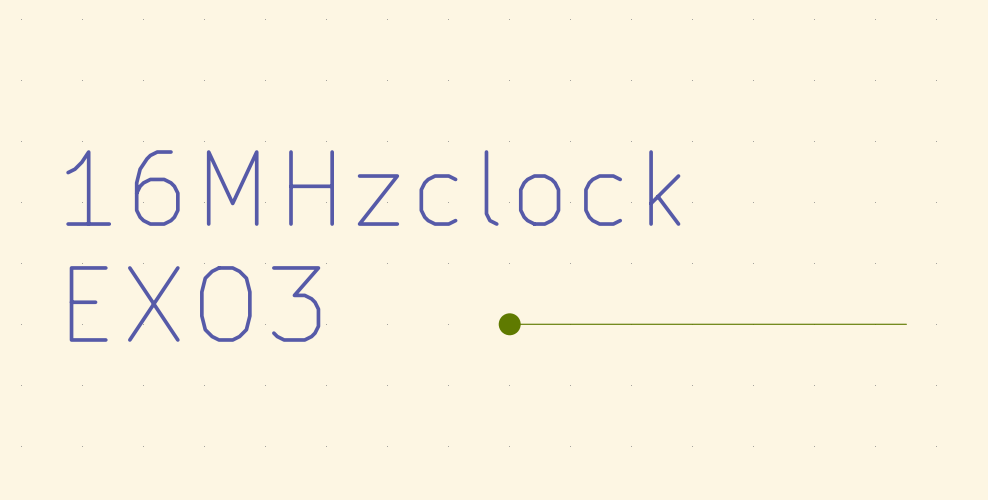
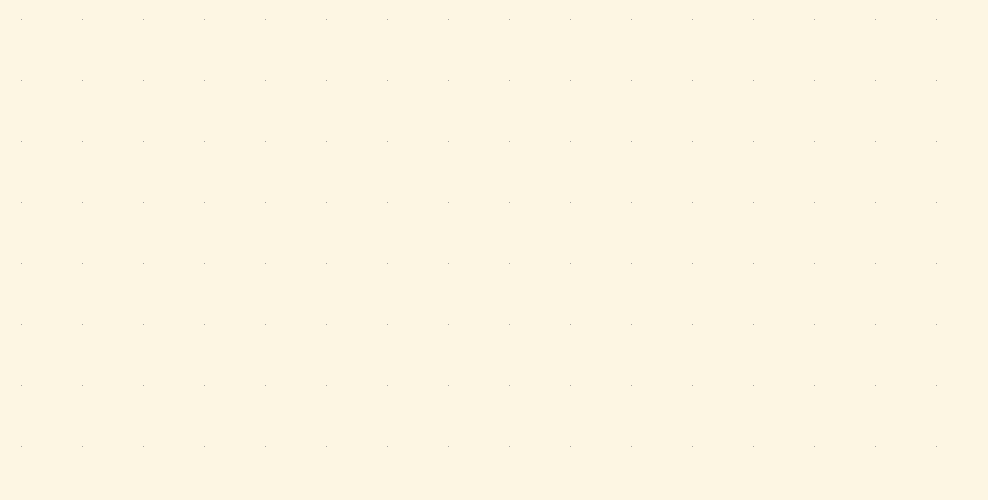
text: 16MHzclock (373, 188) -> none
text: EXO3 (194, 303) -> none
wire: (509, 324) (906, 324) -> none
junction: (509, 324) -> none

